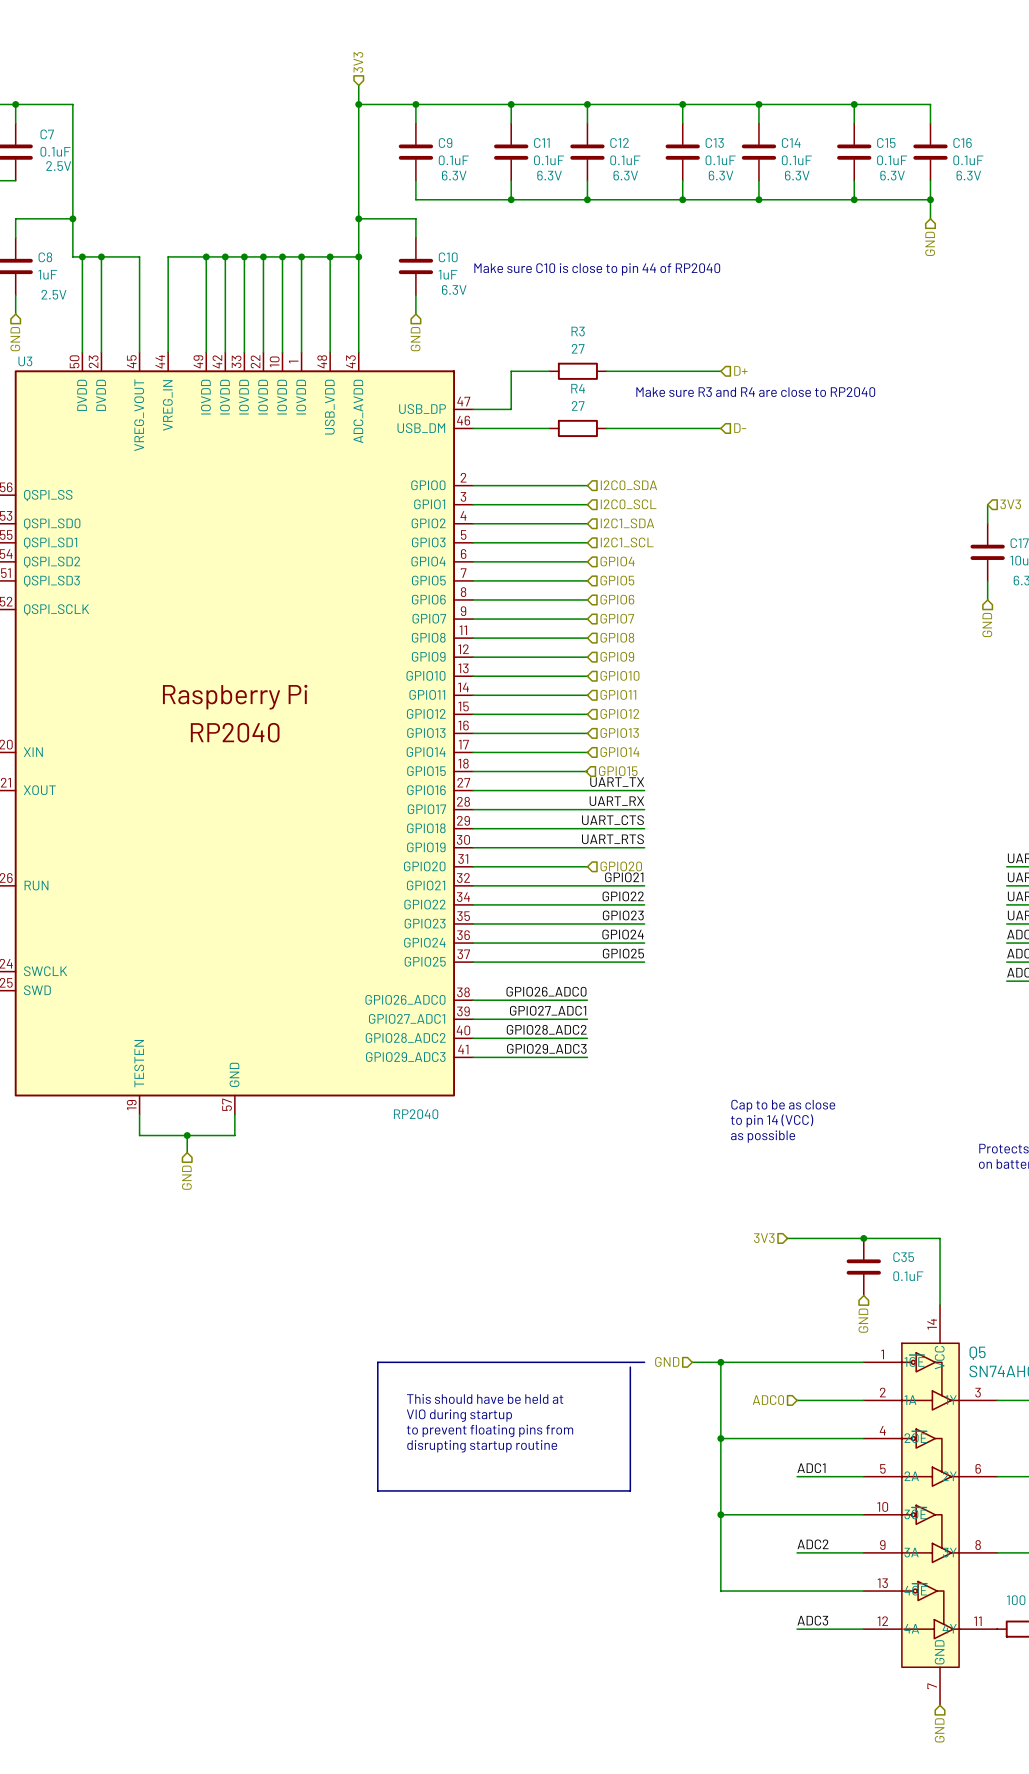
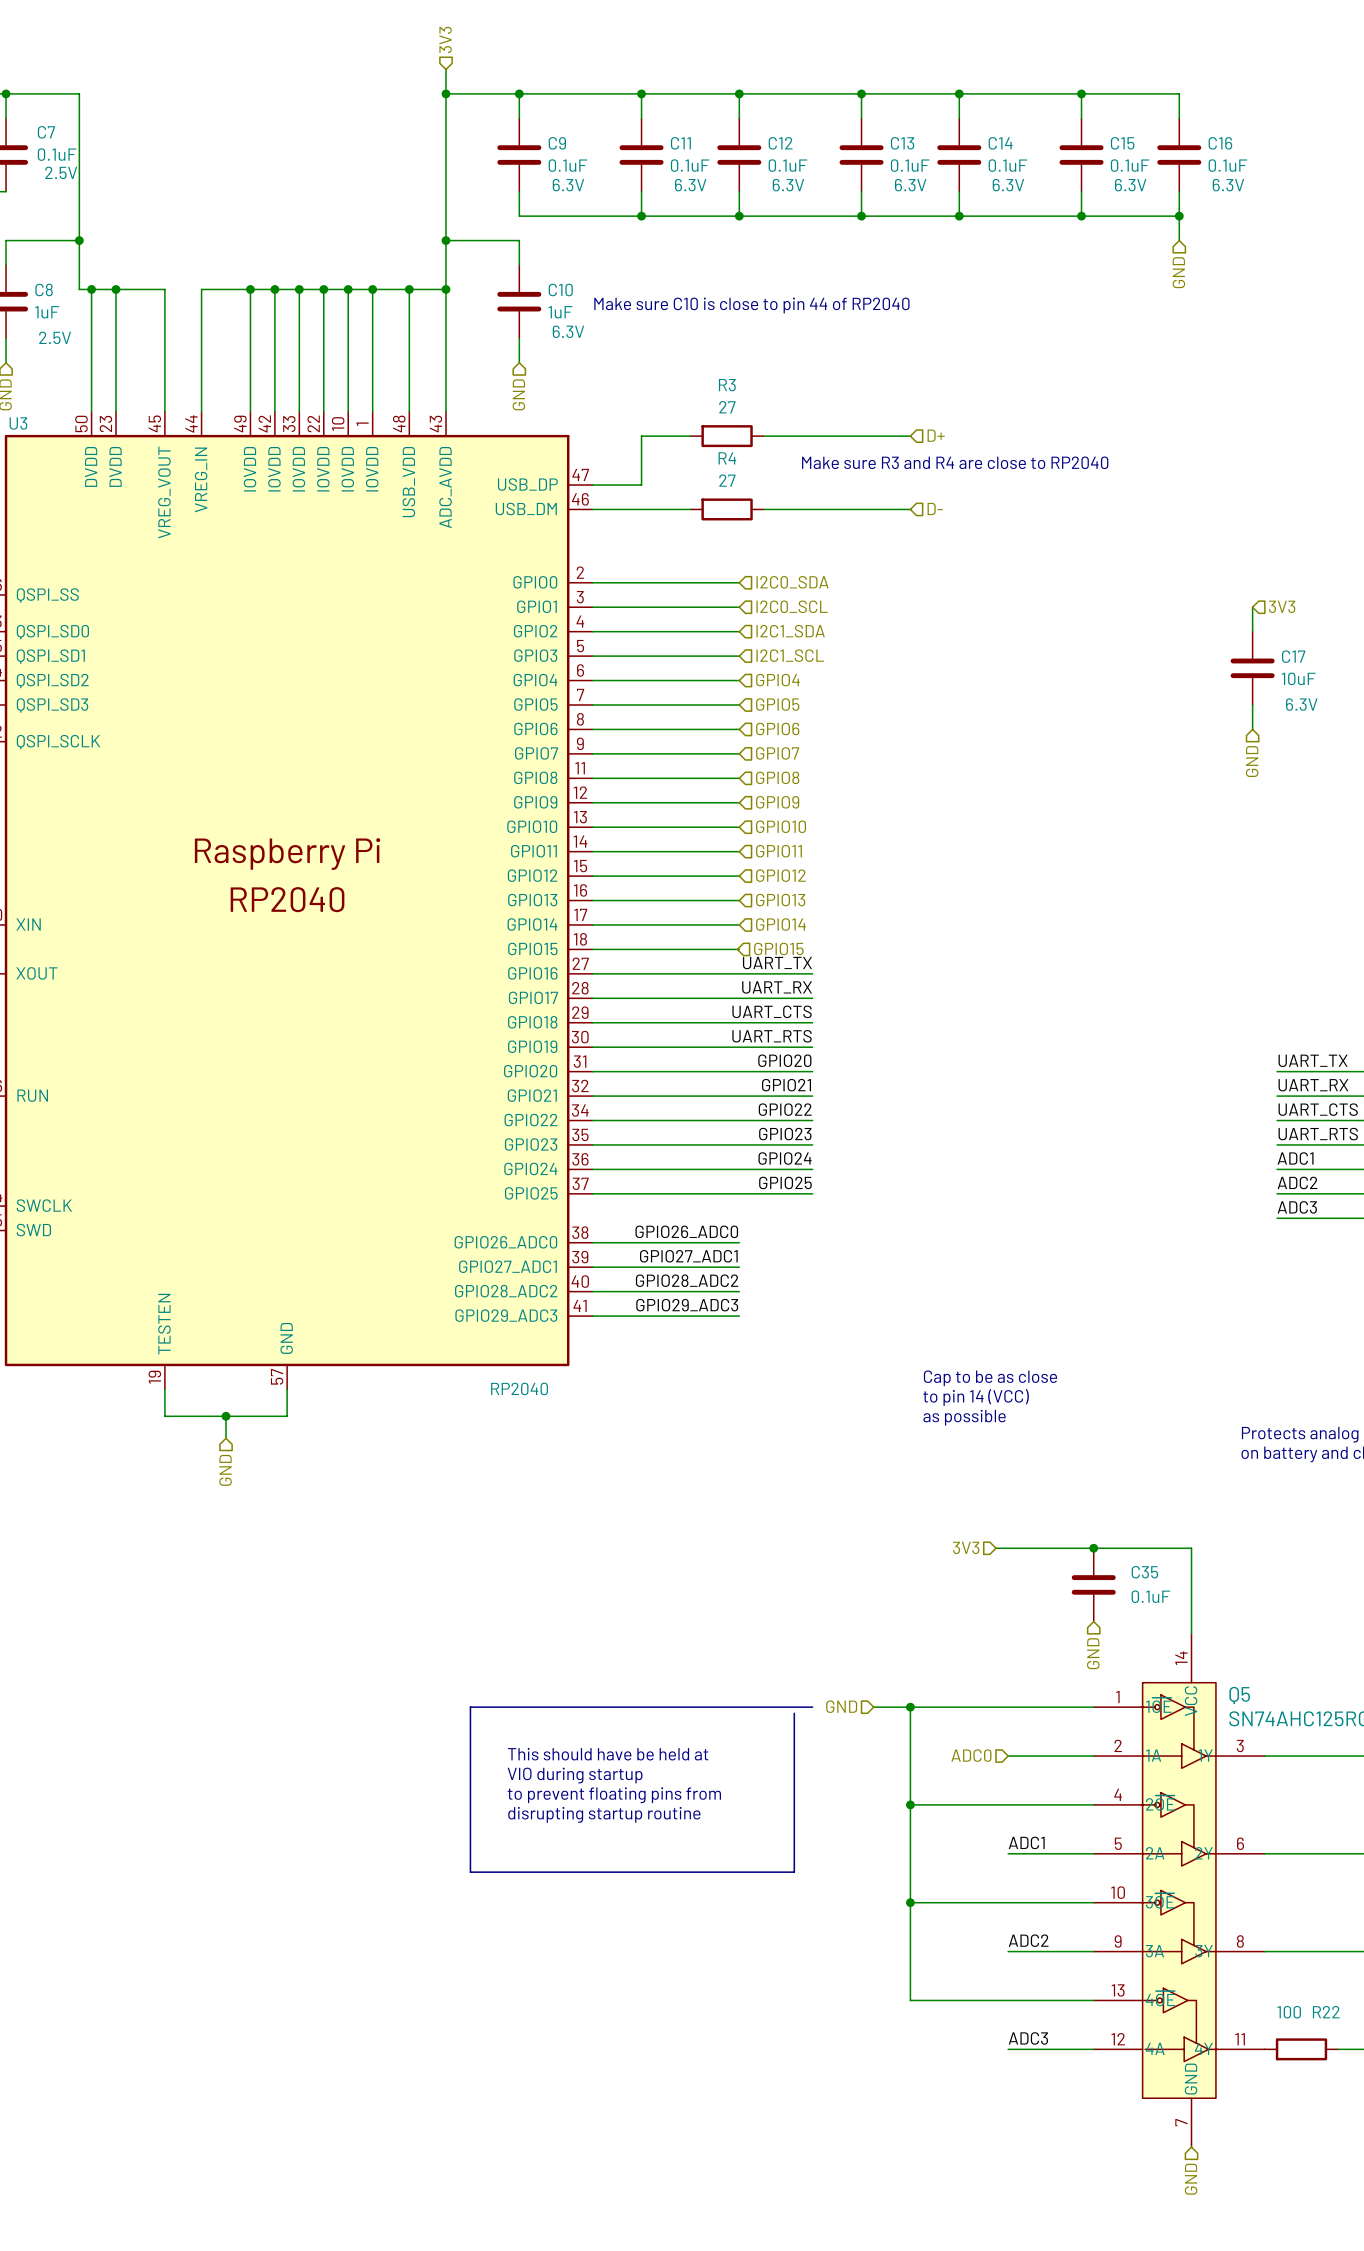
label: none -> GPIO20 (784, 1060)
wire: none -> (739, 1071) (812, 1071)
hierarchical label: GPIO20 (621, 866) -> none

